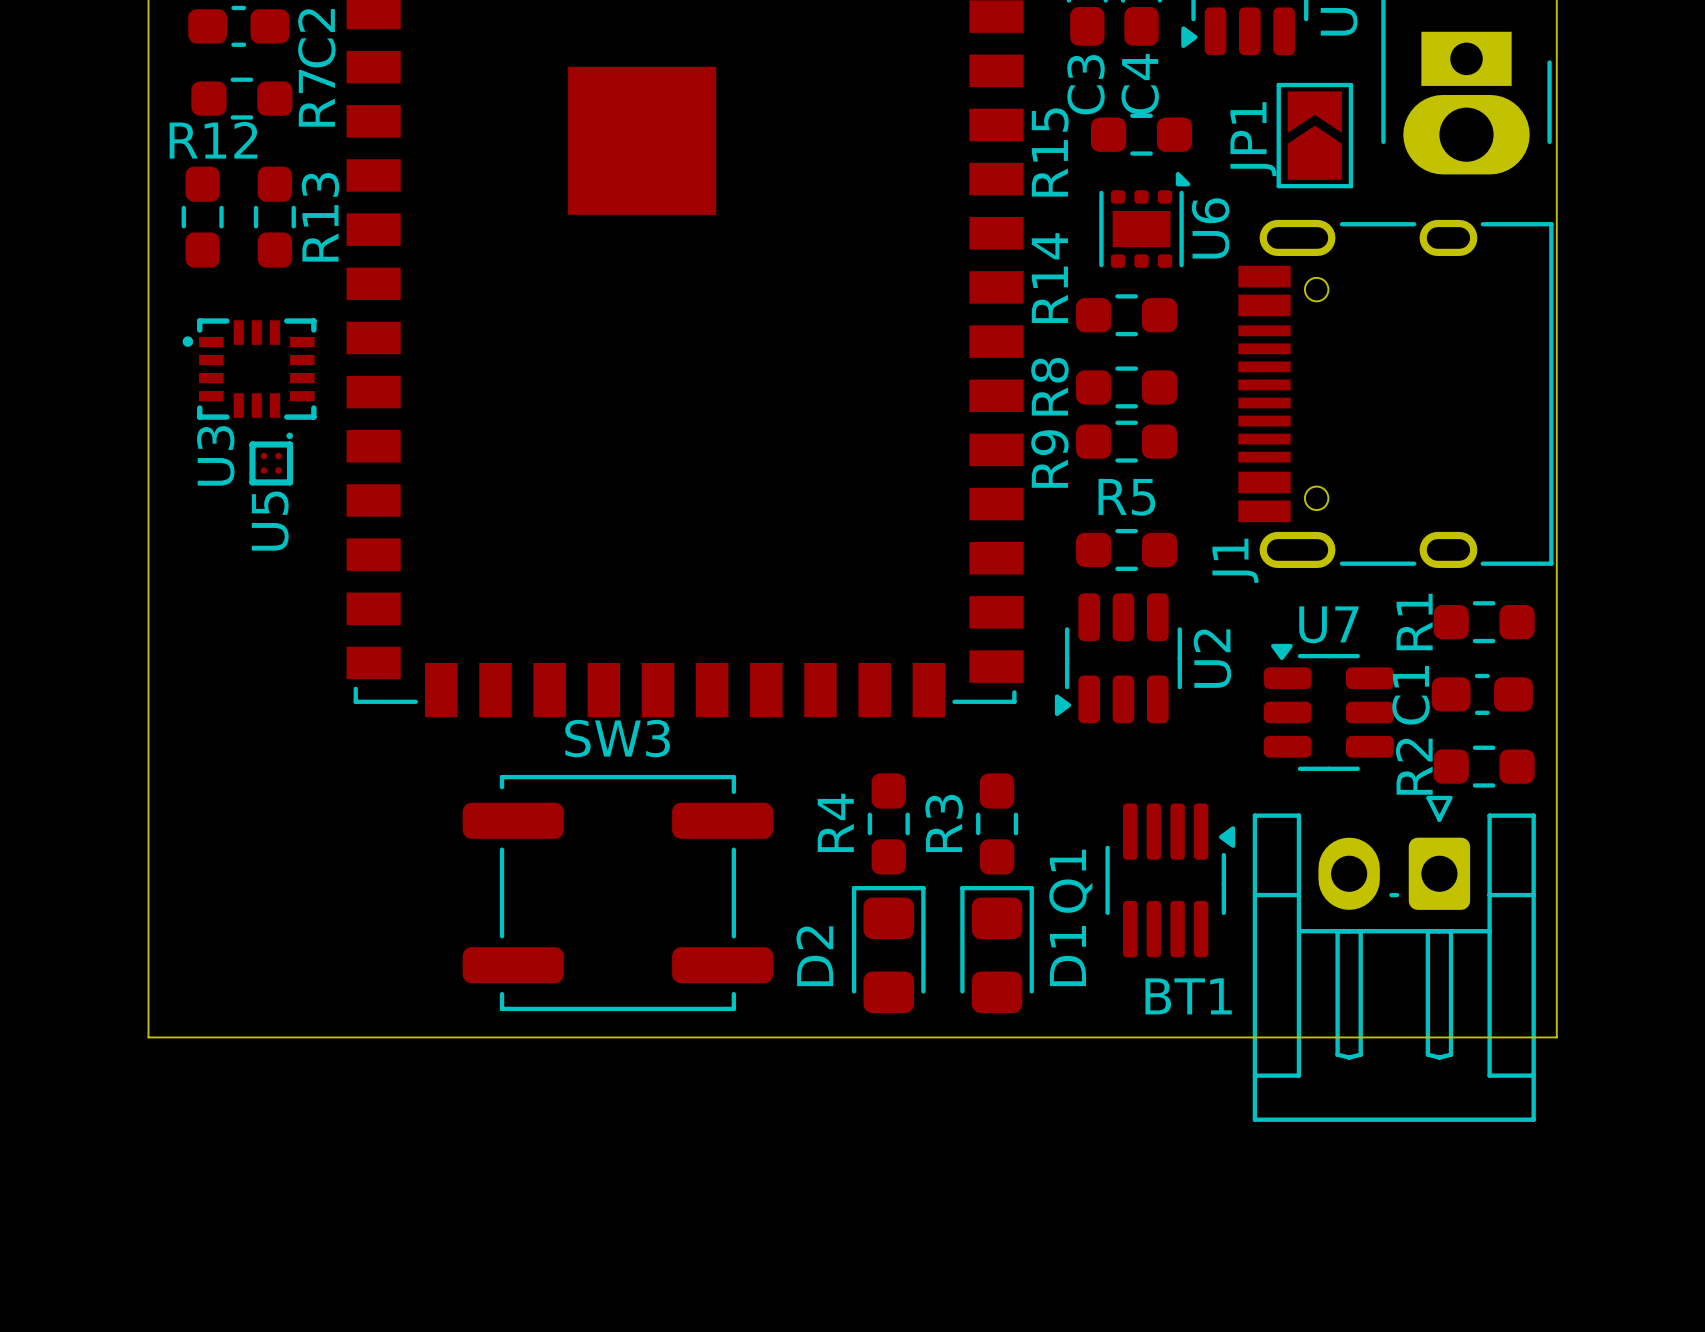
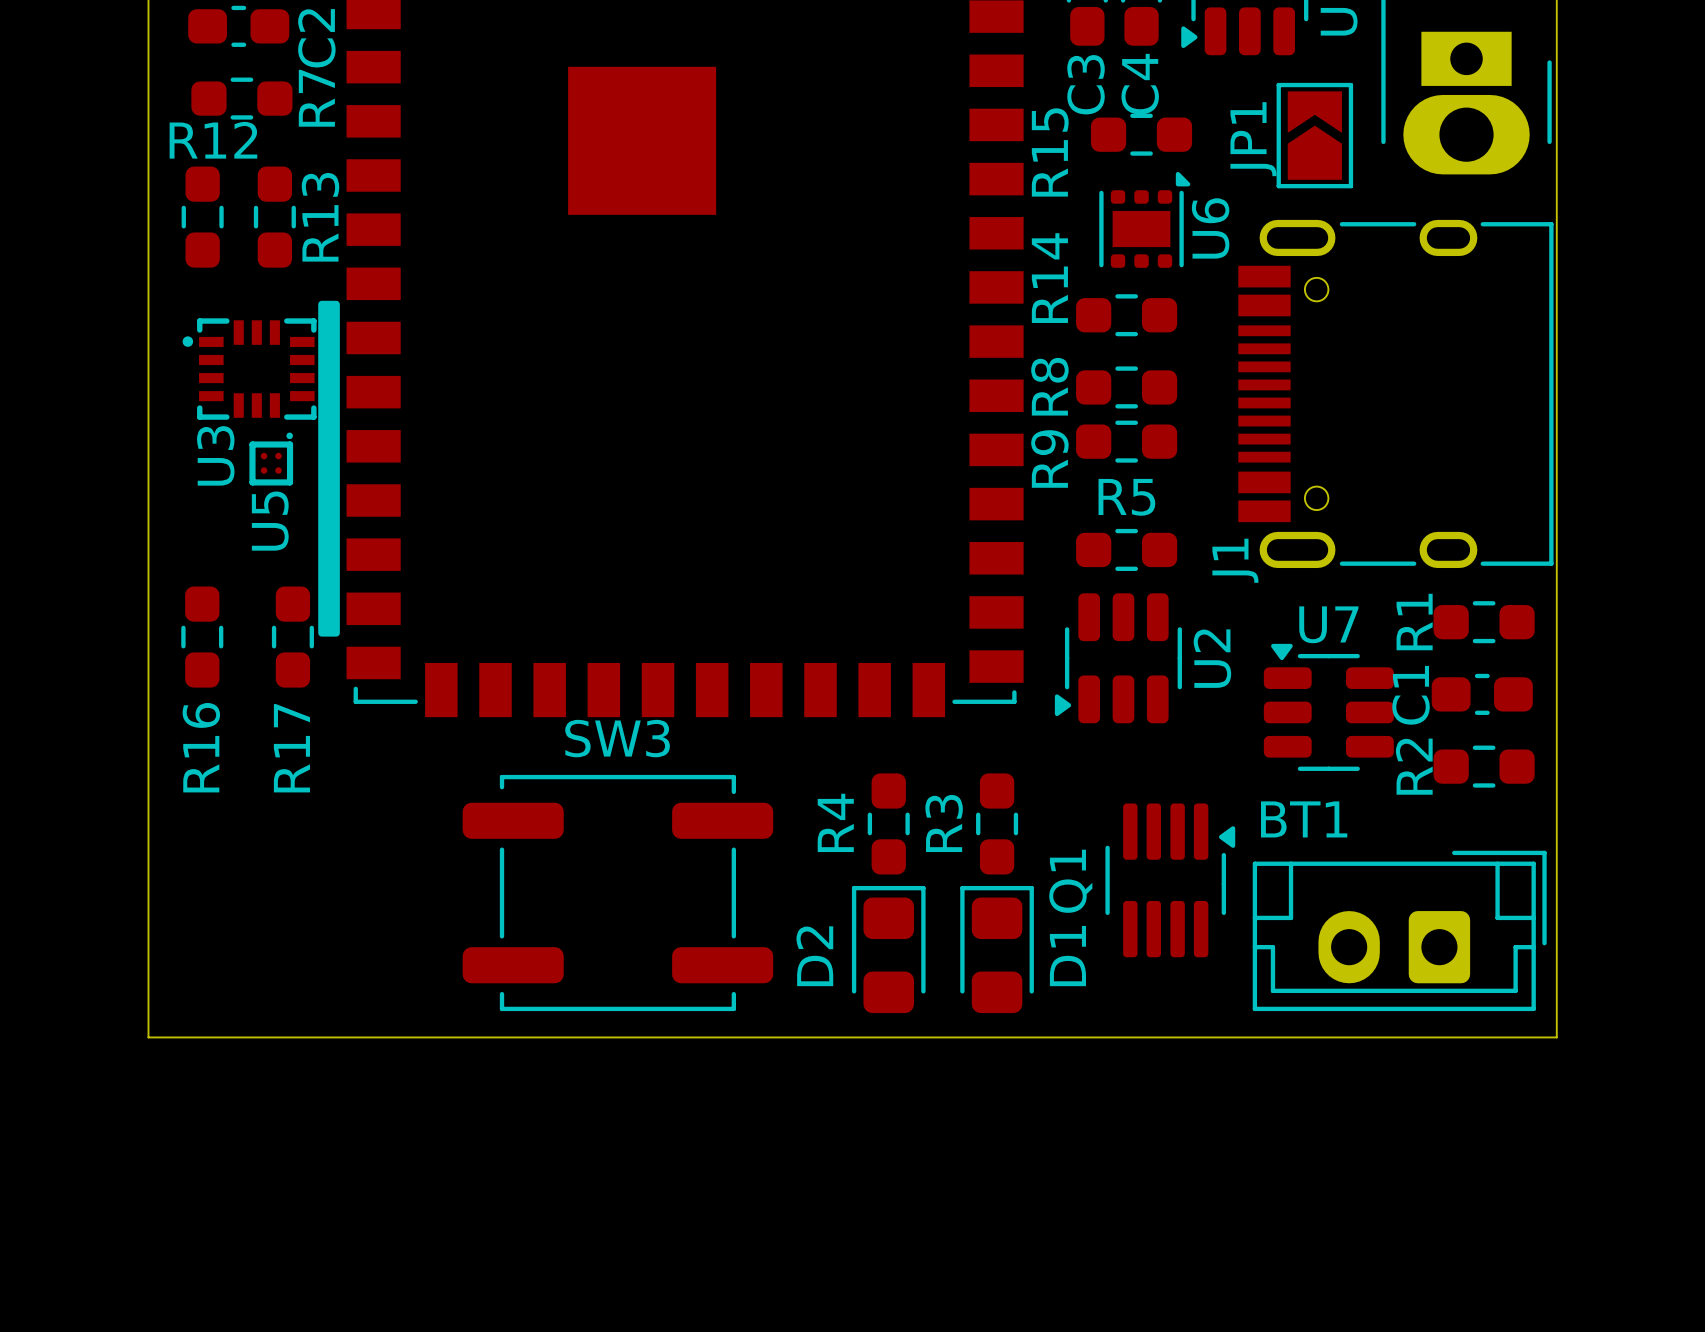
drawing: none -> [318, 300, 340, 637]
R16: none -> (202, 637)
R17: none -> (292, 637)
BT1 footprint: [1252, 795, 1536, 1122] -> [1252, 850, 1547, 1012]
BT1 name position: BT1 (1188, 996) -> BT1 (1304, 819)

